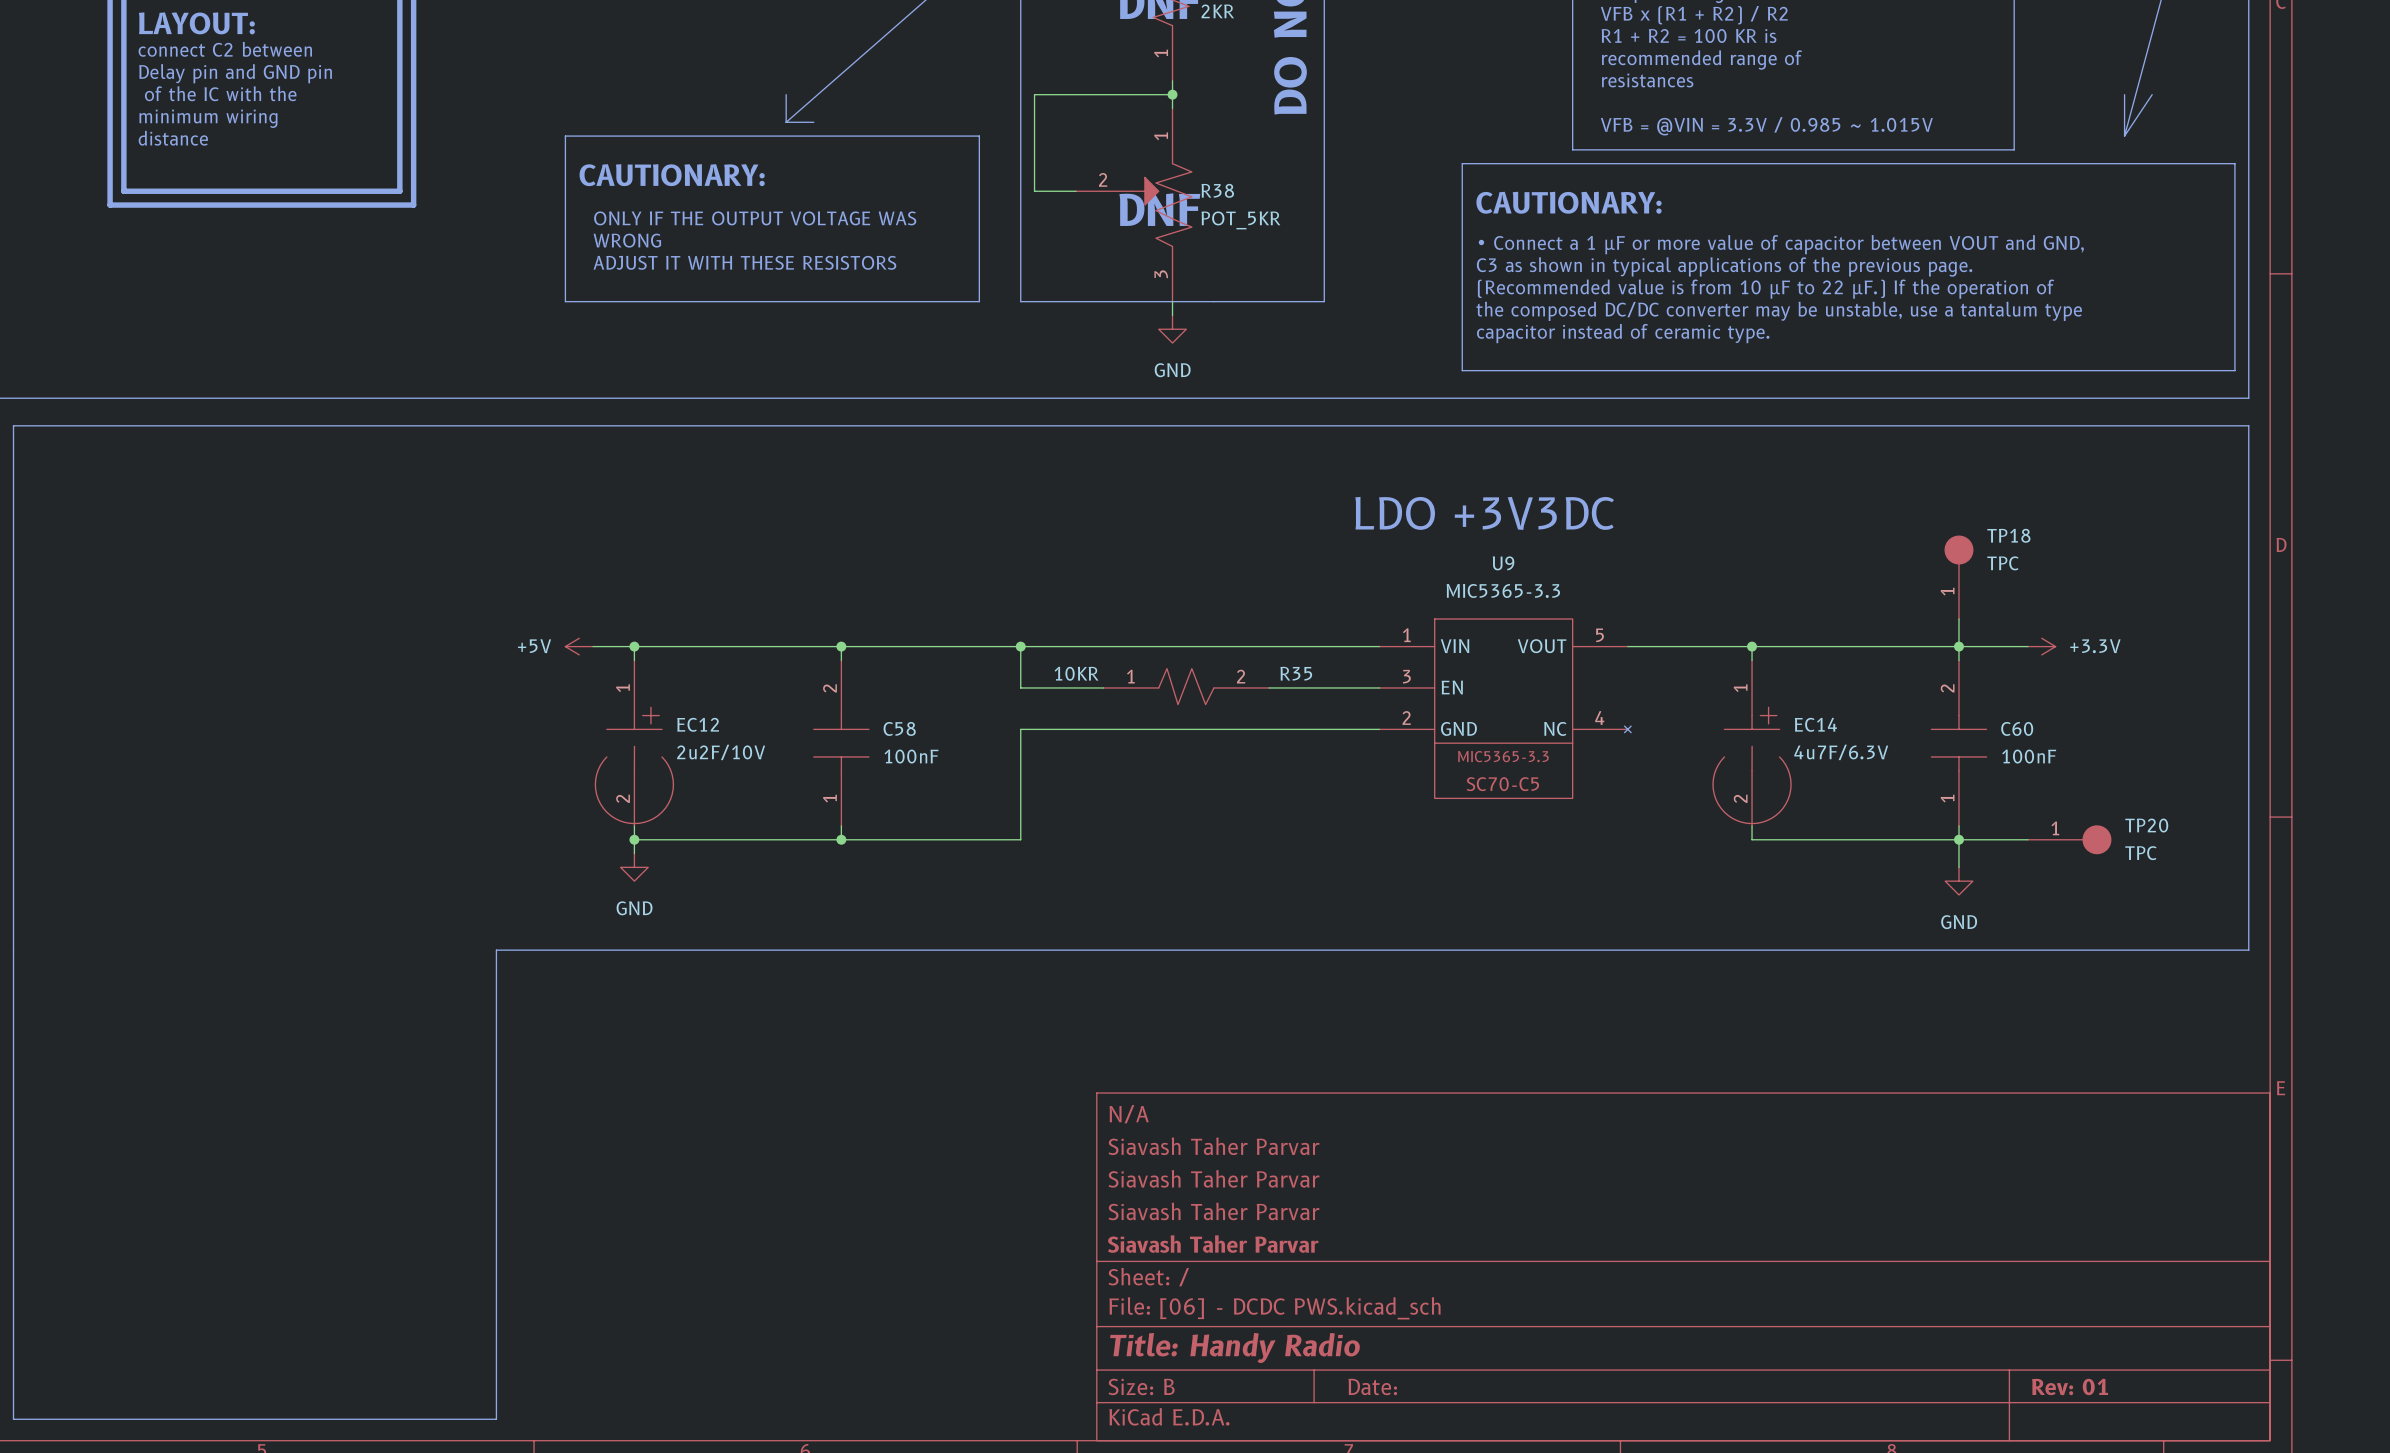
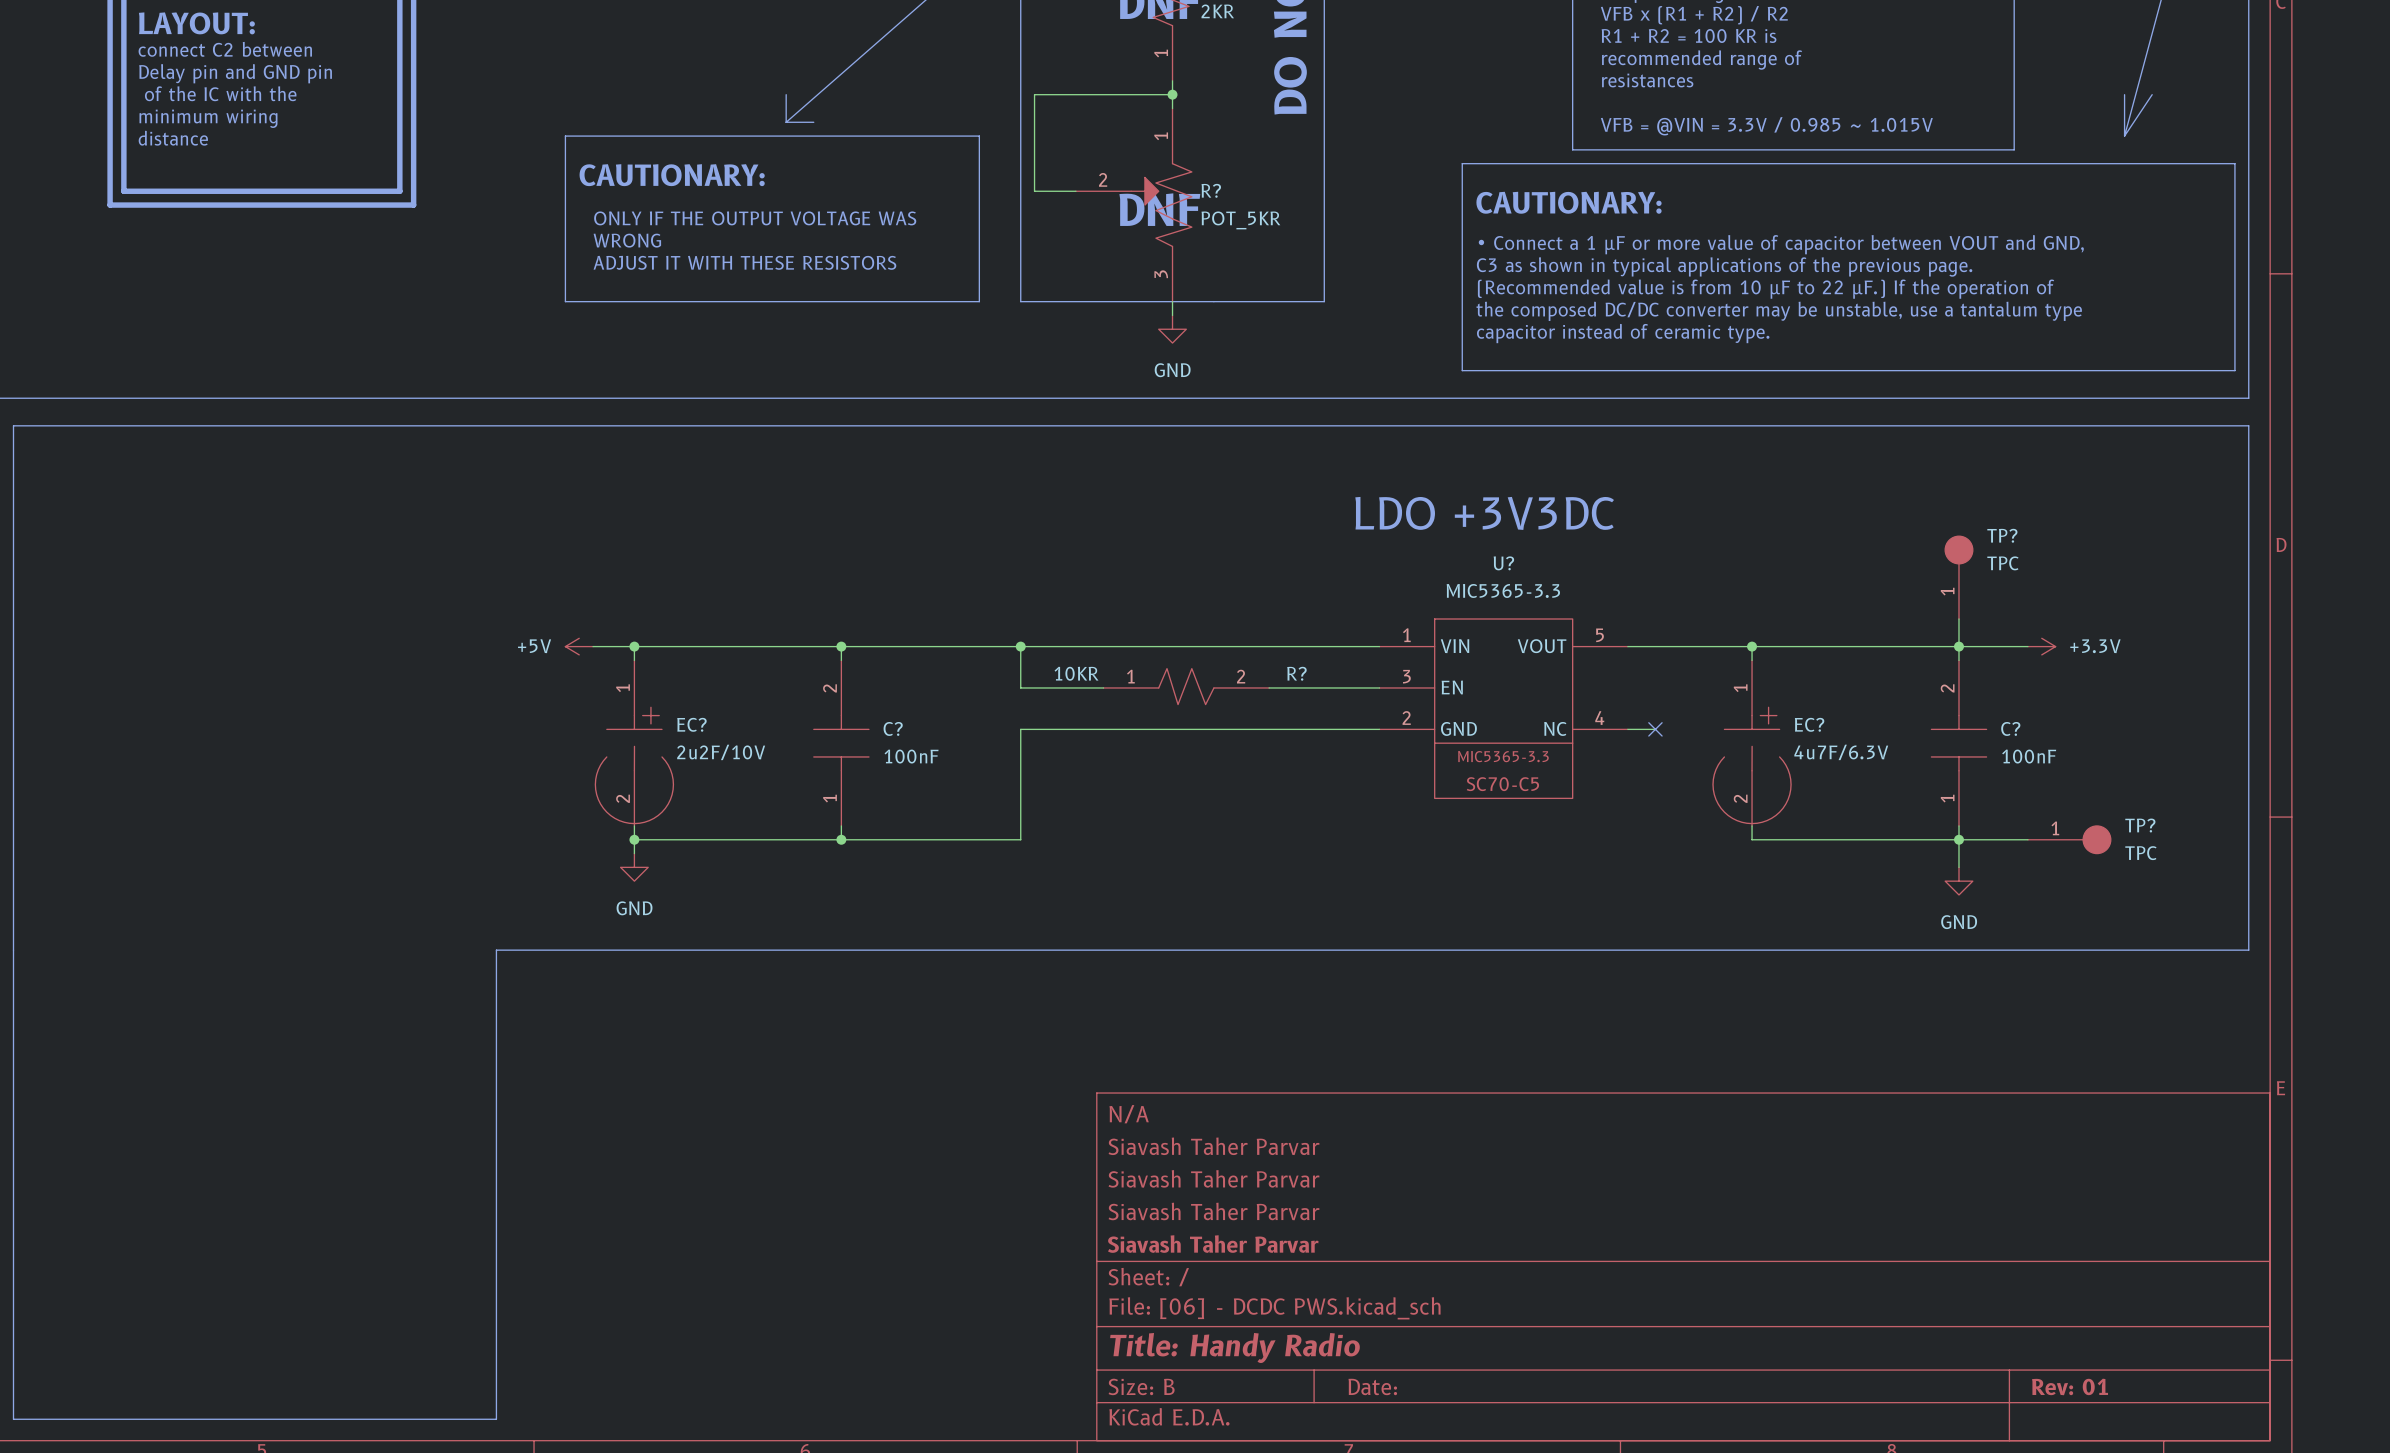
R38 name: R38 (1217, 190) -> R? (1211, 190)
TP18 name: TP18 (2008, 535) -> TP? (2002, 535)
R35 name: R35 (1296, 673) -> R? (1296, 673)
U?: none -> MIC5365-3.3 (1503, 708)
U9: MIC5365-3.3 (1505, 708) -> none
EC12 name: EC12 (698, 724) -> EC? (691, 724)
EC14 name: EC14 (1815, 724) -> EC? (1809, 724)
C58 name: C58 (899, 728) -> C? (893, 728)
C60 name: C60 (2017, 728) -> C? (2010, 728)
wire: none -> (1627, 729) (1655, 729)
no-connect mark: none -> (1655, 729)
TP20 name: TP20 (2146, 825) -> TP? (2140, 825)

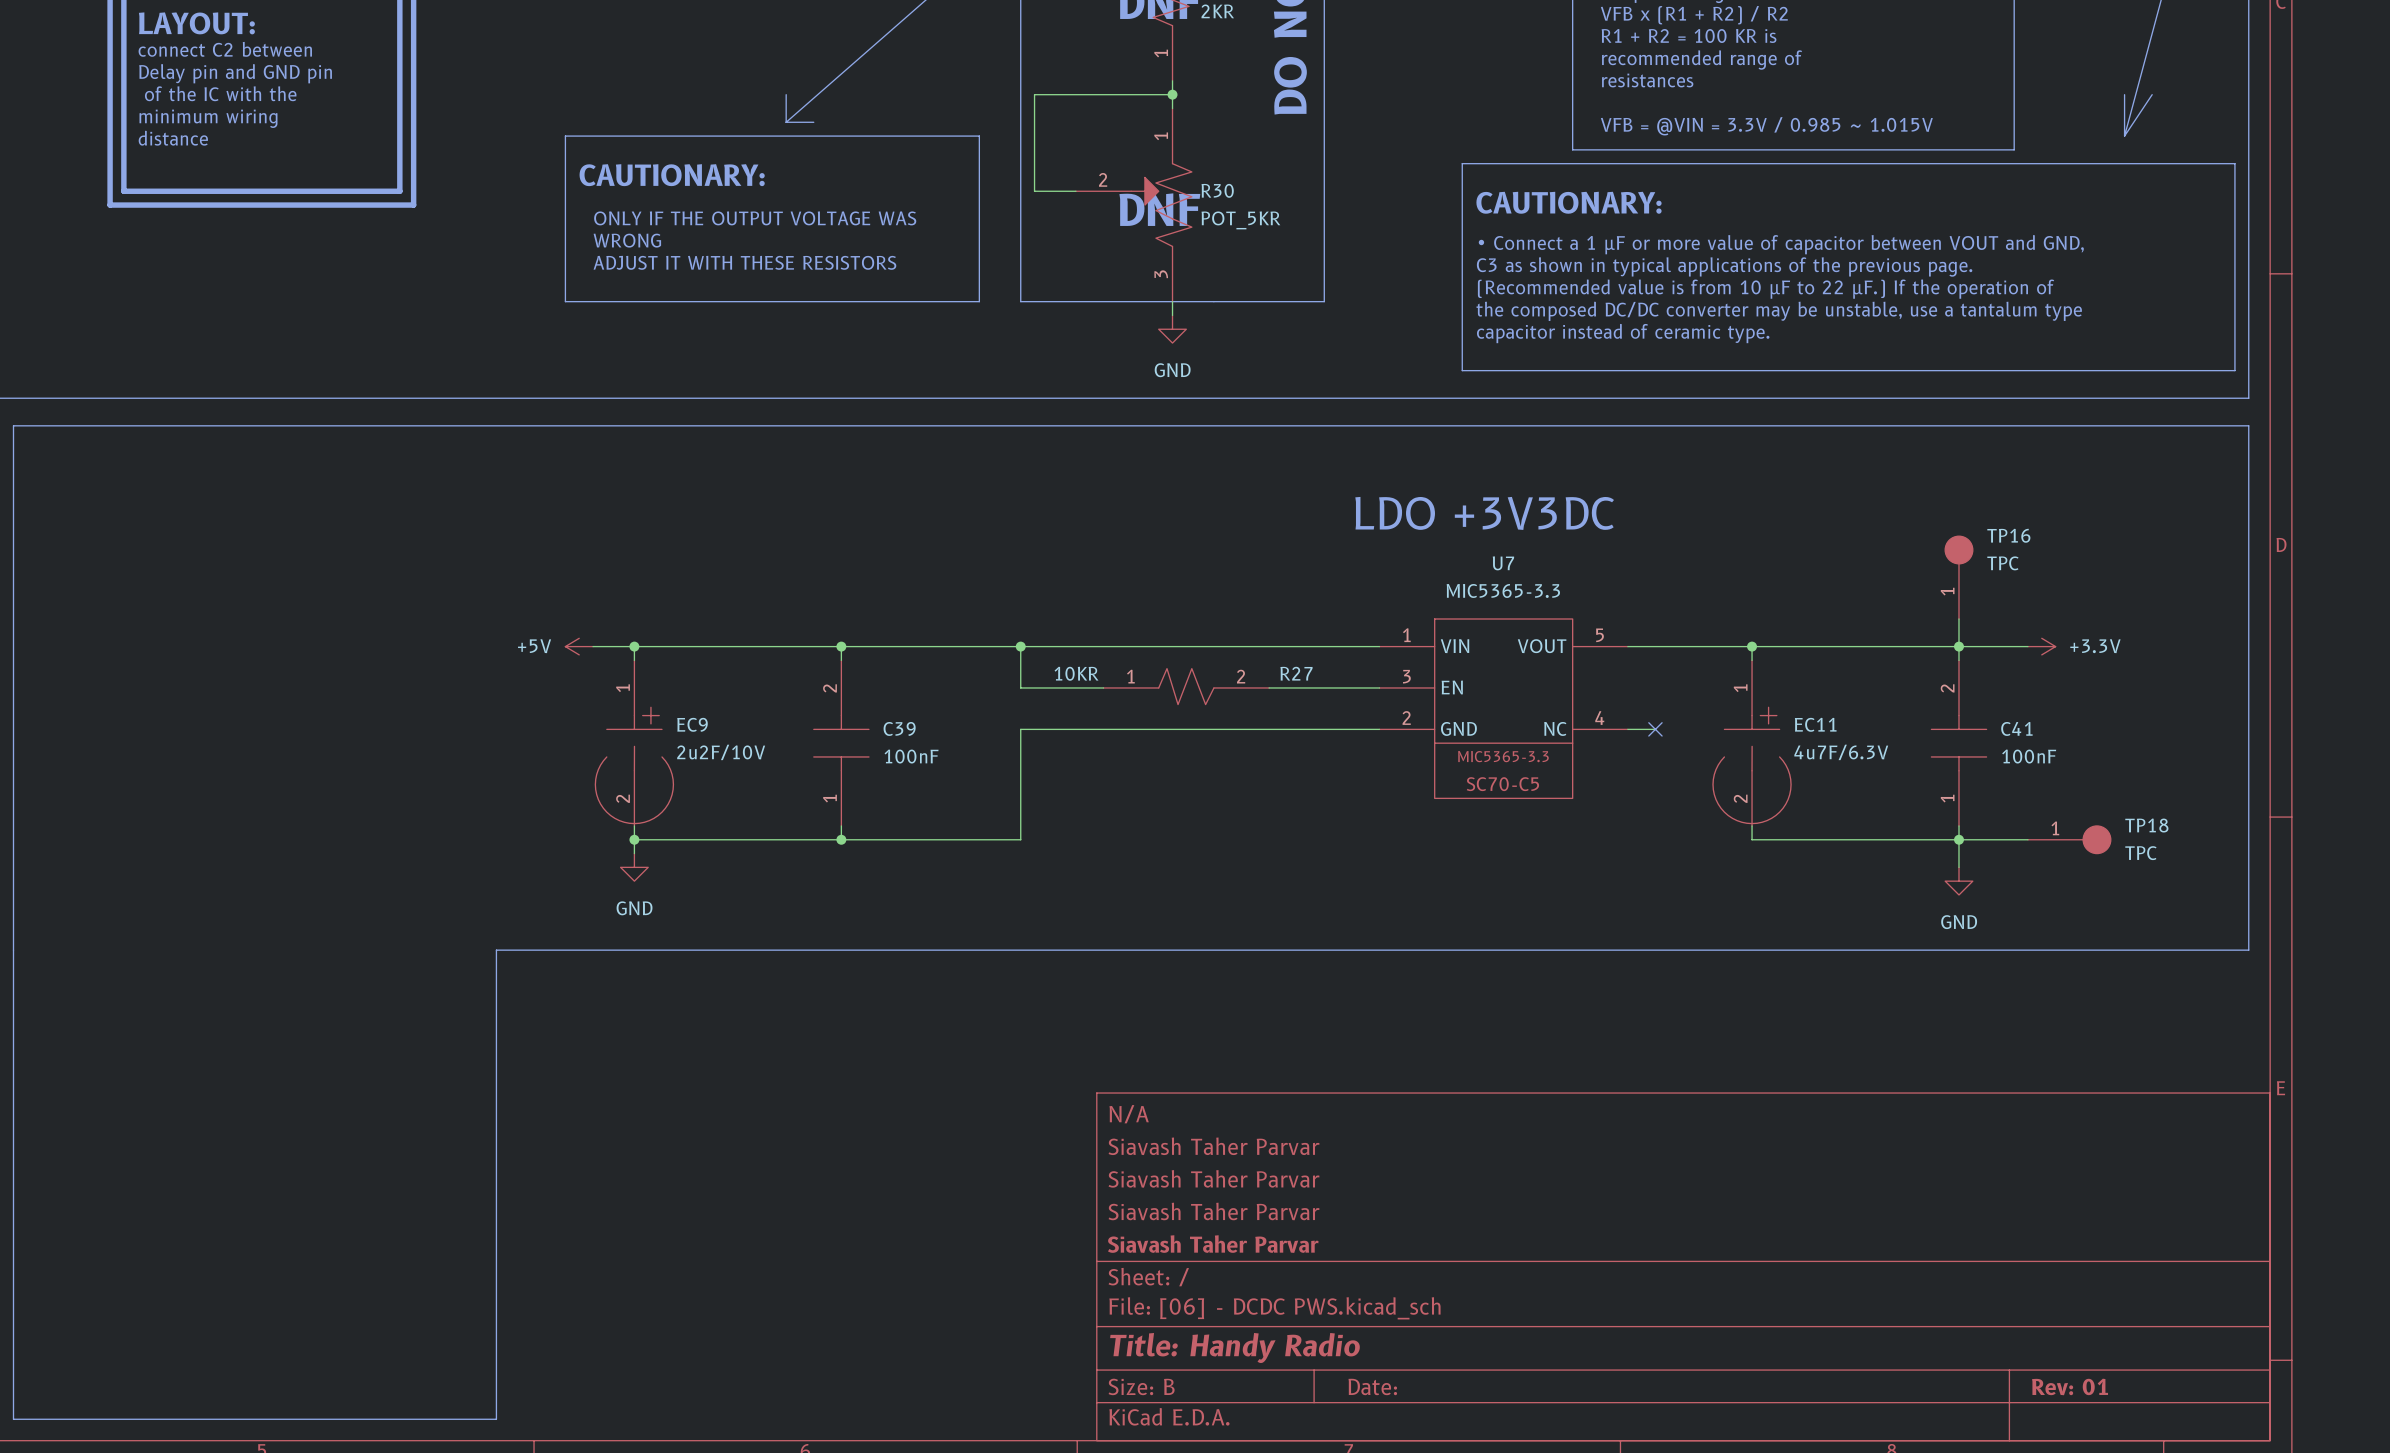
R? name: R? (1211, 190) -> R30 (1217, 190)
TP? name: TP? (2002, 535) -> TP16 (2008, 535)
U? name: U? (1503, 563) -> U7 (1503, 563)
R? name: R? (1296, 673) -> R27 (1296, 673)
EC? name: EC? (691, 724) -> EC9 (692, 724)
EC? name: EC? (1809, 724) -> EC11 (1815, 724)
C? name: C? (893, 728) -> C39 (899, 728)
C? name: C? (2010, 728) -> C41 (2016, 728)
TP? name: TP? (2140, 825) -> TP18 (2146, 825)

